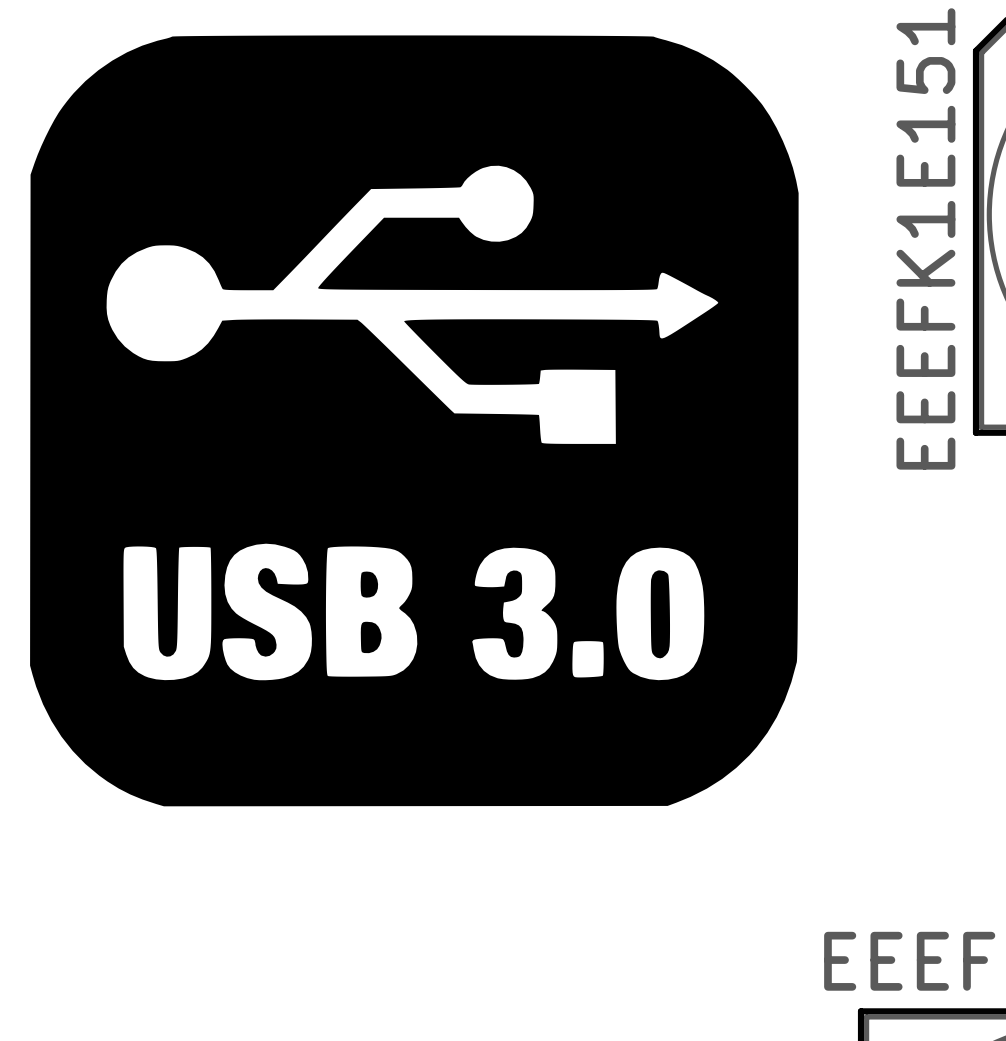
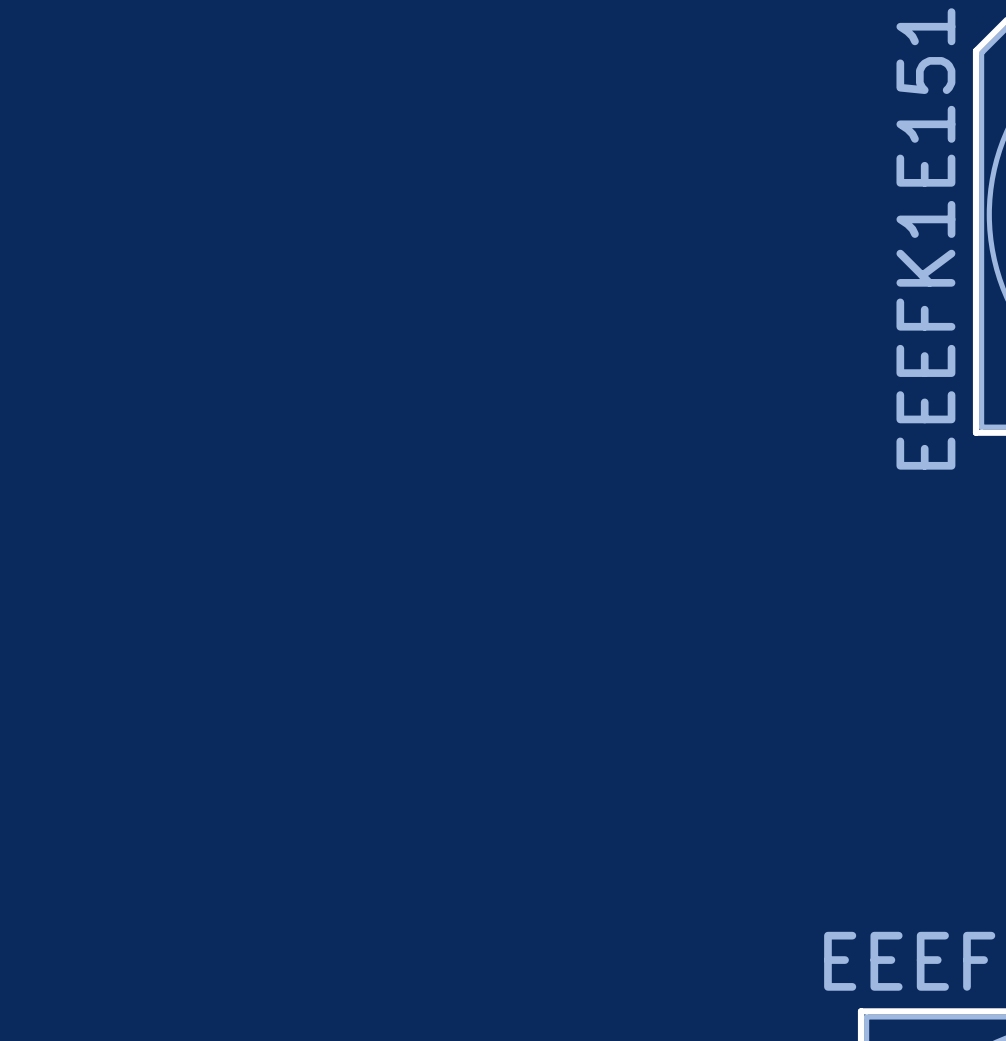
drawing: [30, 35, 799, 807] -> none

